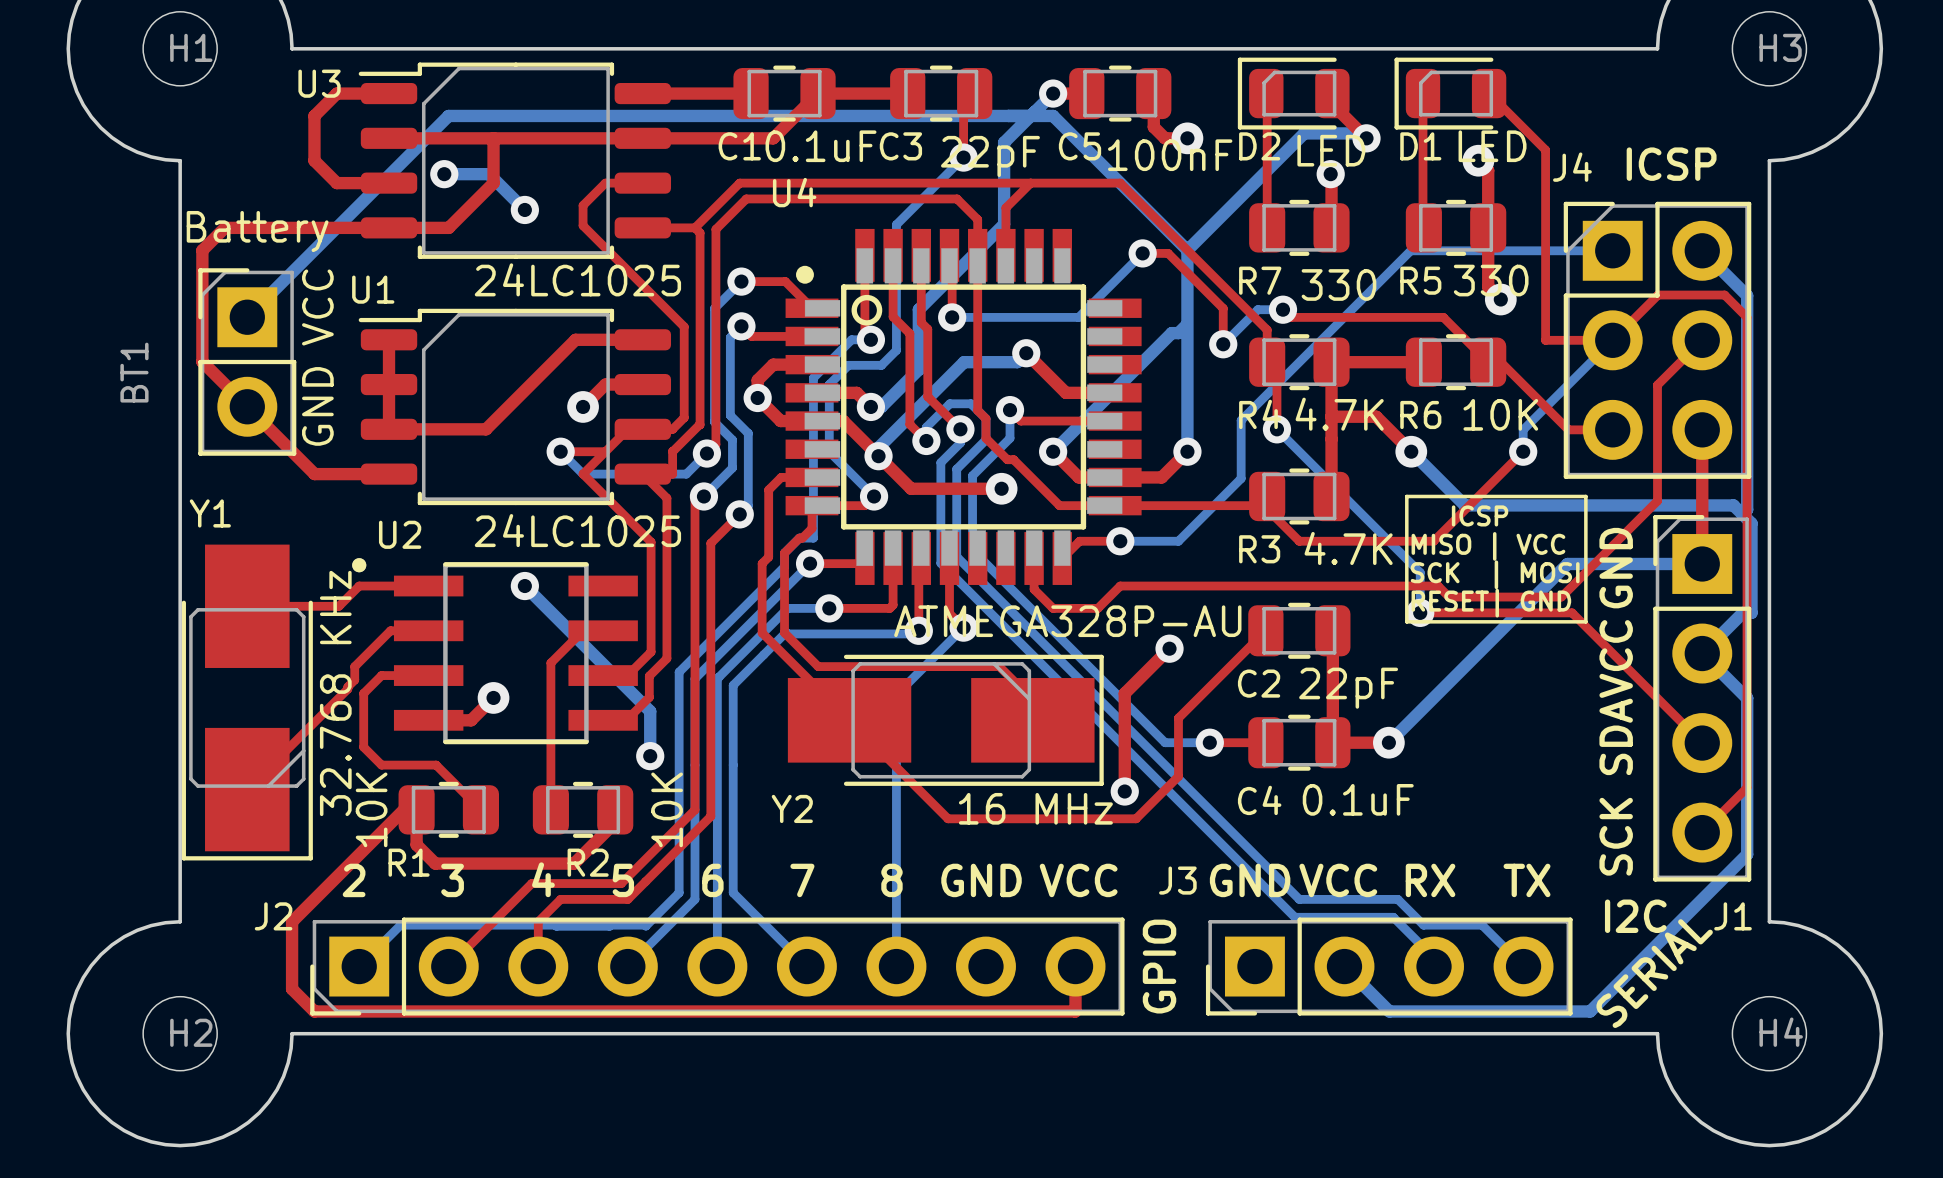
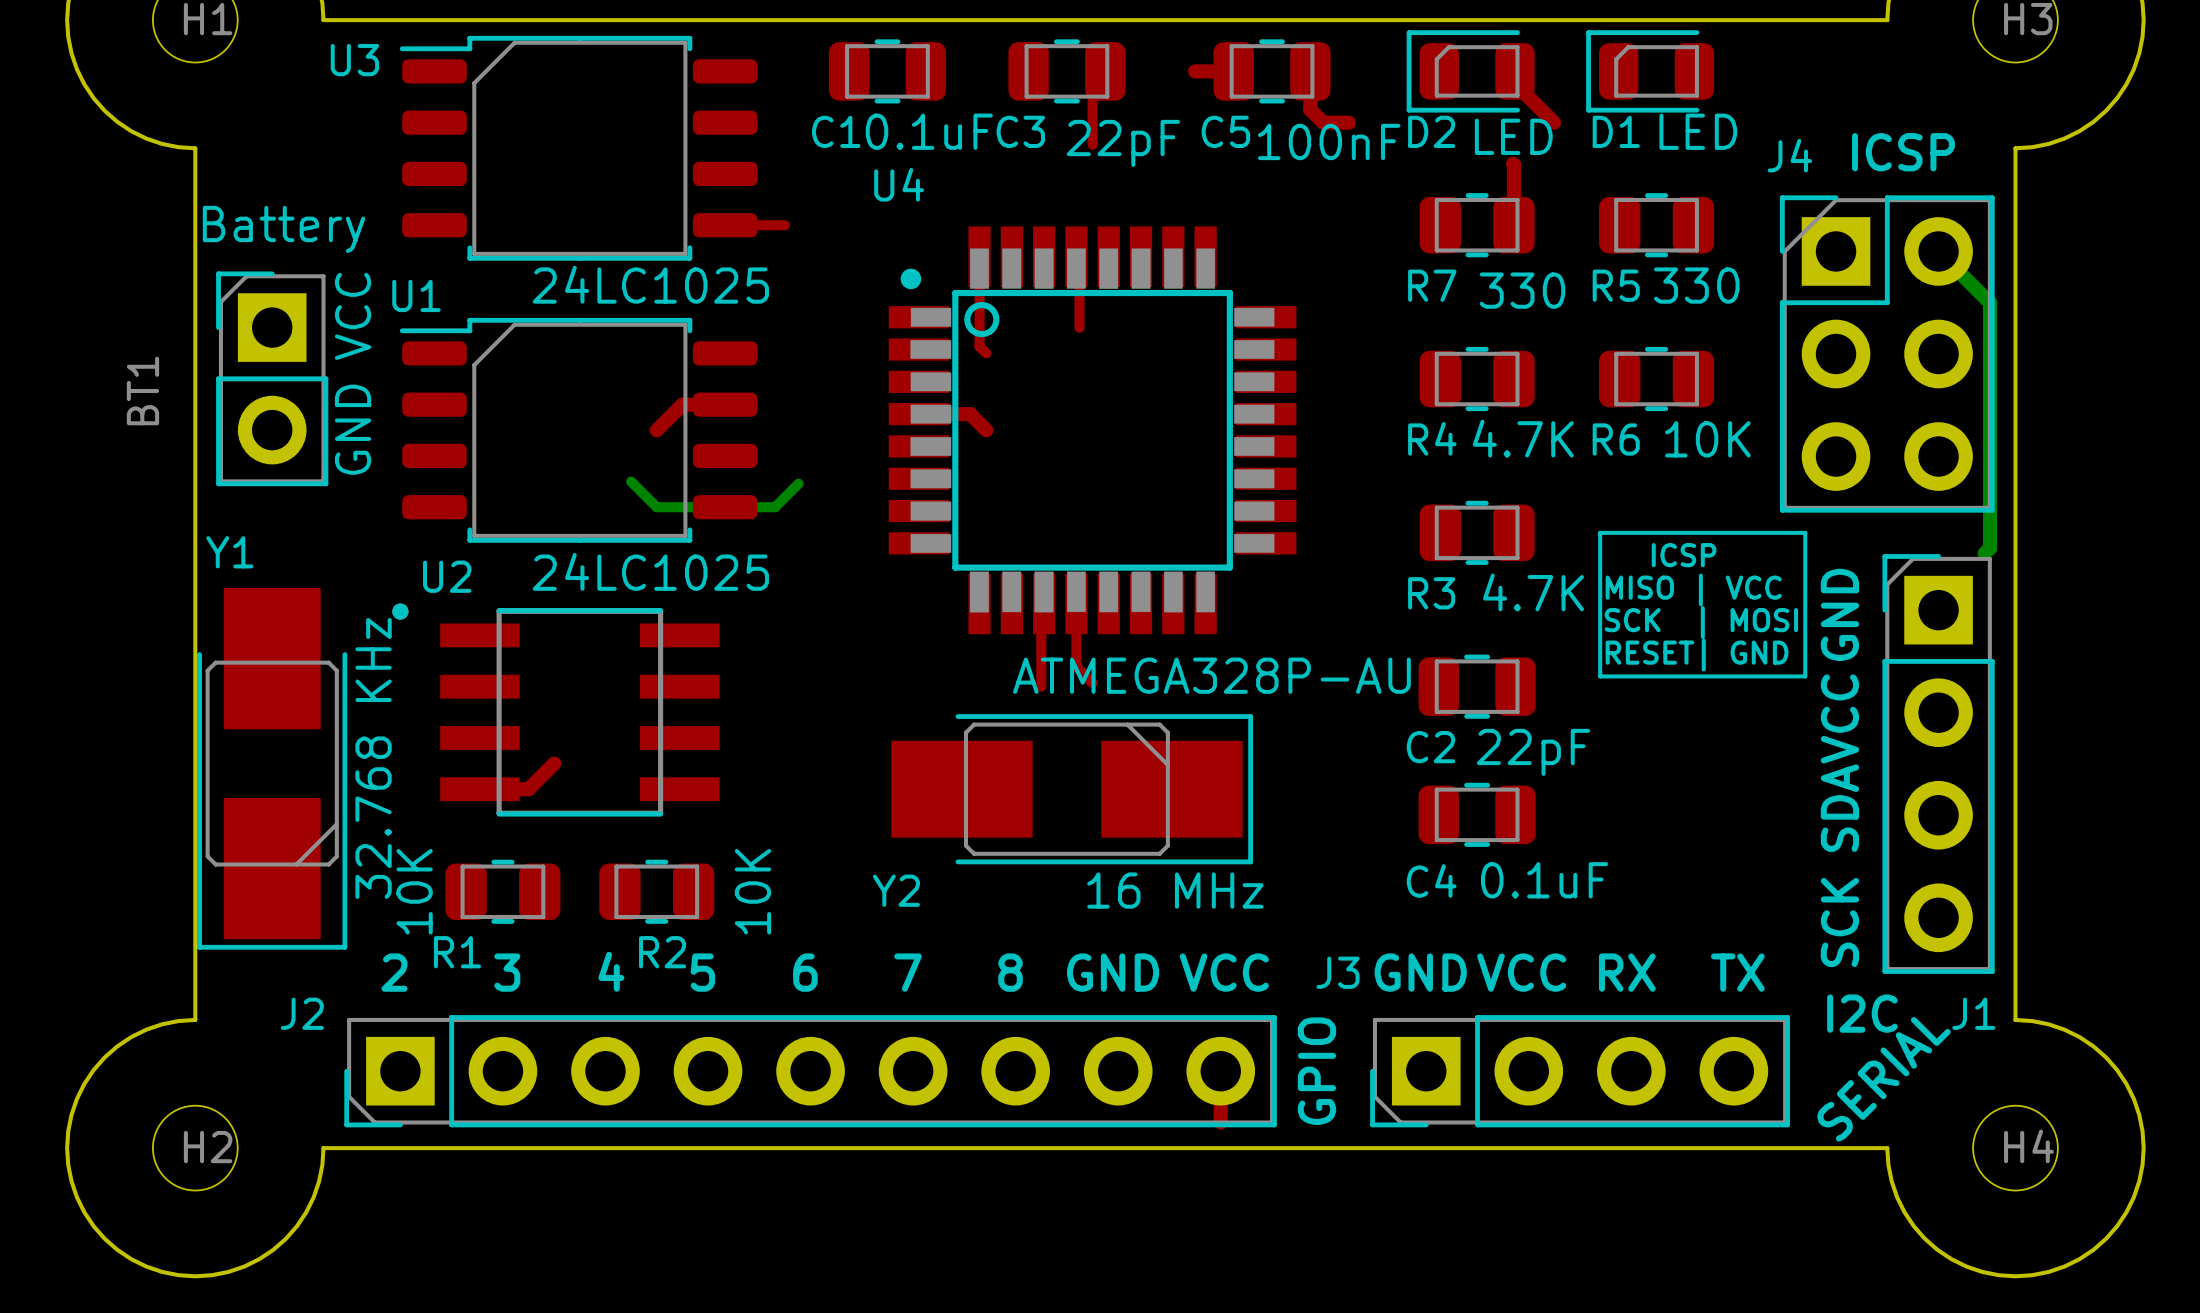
top track: (389, 93) (336, 93) (314, 115) (314, 160) (336, 183) (389, 183) -> none
top track: (642, 93) (751, 93) -> none
top track: (907, 93) (818, 93) (773, 138) (389, 138) -> none
bottom track: (1053, 93) (1004, 142) (1004, 224) (918, 309) (918, 369) (881, 406) (870, 406) -> none
via: (1053, 93) -> none
top track: (1266, 93) (1267, 227) -> none
top track: (1423, 93) (1423, 227) -> none
top track: (1489, 93) (1545, 150) (1545, 340) (1612, 340) (1658, 295) (1724, 295) (1747, 317) (1747, 787) (1702, 832) -> none
top track: (493, 138) (493, 183) (448, 227) (224, 227) (202, 250) (202, 361) (314, 474) (389, 474) -> none
via: (1187, 138) -> none
bottom track: (1366, 138) (1361, 133) (1304, 133) (1187, 250) -> none
via: (1366, 138) -> none
bottom track: (963, 157) (896, 224) (896, 350) (881, 365) (848, 365) (829, 384) (829, 451) (874, 496) -> none
via: (963, 157) -> none
top track: (1478, 160) (1488, 170) (1488, 286) (1500, 299) -> none
via: (1478, 160) -> none
bottom track: (444, 174) (489, 174) (524, 209) -> none
via: (444, 174) -> none
via: (1330, 174) -> none
top track: (642, 183) (605, 183) (583, 205) (583, 225) (684, 326) (684, 417) (672, 429) (627, 429) (583, 474) (651, 542) (651, 651) (627, 675) (603, 675) -> none
top track: (1030, 183) (1005, 207) (1005, 255) -> none
via: (524, 209) -> none
bottom track: (1187, 250) (1053, 115) (448, 115) (247, 317) -> none
bottom track: (1187, 250) (1187, 451) -> none
bottom track: (1612, 250) (1410, 250) (1241, 420) (1241, 478) (1178, 541) (1120, 541) -> none
top track: (1142, 253) (1168, 253) (1223, 308) (1223, 344) -> none
bottom track: (1142, 253) (1078, 317) (952, 317) -> none
via: (1142, 253) -> none
top track: (893, 255) (893, 316) (909, 333) (909, 424) (926, 440) -> none
top track: (921, 255) (921, 322) (927, 329) (927, 396) (960, 429) -> none
top track: (741, 281) (785, 281) (812, 308) -> none
bottom track: (741, 281) (714, 308) (714, 422) (732, 439) (732, 467) (703, 496) -> none
via: (741, 281) -> none
via: (1500, 299) -> none
top track: (1282, 309) (1290, 317) (1443, 317) (1488, 362) (1500, 362) (1568, 429) (1612, 429) -> none
bottom track: (1282, 309) (1257, 309) (1223, 344) -> none
via: (1282, 309) -> none
via: (952, 317) -> none
bottom track: (1186, 325) (1178, 333) (1171, 333) (1053, 451) -> none
top track: (741, 326) (751, 336) (812, 336) -> none
bottom track: (741, 326) (730, 337) (730, 415) (748, 433) (748, 505) (739, 514) -> none
via: (741, 326) -> none
top track: (389, 339) (389, 429) (486, 429) (575, 339) (642, 339) -> none
bottom track: (870, 339) (851, 339) (813, 378) (813, 538) (799, 538) (784, 553) (784, 566) (679, 672) (679, 892) (645, 926) (400, 925) (359, 966) -> none
via: (870, 339) -> none
bottom track: (1612, 340) (1523, 429) (1523, 451) -> none
top track: (1702, 340) (1657, 385) (1657, 500) (1561, 597) (1449, 597) (1438, 586) (1120, 586) (1097, 608) (1053, 608) (1034, 589) (1034, 558) -> none
via: (1223, 344) -> none
top track: (1026, 353) (1065, 392) (1115, 392) -> none
bottom track: (1026, 353) (1017, 362) (964, 362) (878, 447) (878, 456) -> none
via: (1026, 353) -> none
top track: (1423, 362) (1331, 362) (1331, 496) -> none
top track: (812, 364) (773, 364) (757, 380) (757, 397) (780, 421) (843, 421) (911, 488) (1001, 488) -> none
via: (757, 397) -> none
via: (583, 406) -> none
via: (870, 406) -> none
top track: (1010, 410) (1020, 421) (1115, 421) -> none
bottom track: (1010, 410) (1010, 438) (972, 475) (972, 550) (1165, 742) (1209, 742) -> none
via: (1010, 410) -> none
top track: (1331, 416) (1376, 416) (1411, 451) -> none
top track: (699, 424) (673, 451) -> none
top track: (700, 424) (700, 232) (694, 227) (739, 183) (1120, 183) (1267, 330) (1267, 362) (1276, 371) (1276, 429) -> none
bottom track: (960, 429) (960, 443) (940, 462) (940, 563) (1294, 917) (1393, 917) (1434, 957) (1434, 966) -> none
via: (960, 429) -> none
bottom track: (1276, 429) (1420, 572) (1420, 612) -> none
via: (1276, 429) -> none
top track: (1702, 429) (1702, 563) -> none
bottom track: (926, 440) (926, 427) (949, 403) (971, 403) (985, 418) (985, 439) (956, 469) (956, 556) (1299, 899) (1397, 899) (1423, 925) (1482, 925) (1523, 966) -> none
via: (926, 440) -> none
top track: (560, 451) (605, 451) -> none
via: (560, 451) -> none
top track: (672, 451) (672, 474) (642, 474) (666, 498) (666, 658) (649, 676) (649, 697) (626, 720) (603, 720) -> none
top track: (1053, 451) (1078, 477) (1161, 477) (1187, 451) -> none
via: (1053, 451) -> none
via: (1187, 451) -> none
bottom track: (1411, 451) (1465, 505) (1733, 505) (1751, 523) (1751, 612) (1742, 612) (1702, 653) (1747, 698) (1747, 854) (1590, 1011) (1389, 1011) (1344, 966) -> none
via: (1411, 451) -> none
top track: (1523, 451) (1433, 541) (1299, 541) (1267, 509) (1267, 496) -> none
via: (1523, 451) -> none
top track: (706, 453) (715, 444) (715, 229) (746, 198) (957, 198) (977, 219) (977, 410) (985, 418) (985, 438) (1007, 459) (1013, 459) (1059, 505) (1258, 505) -> none
via: (706, 453) -> none
via: (878, 456) -> none
top track: (812, 477) (781, 477) (768, 489) (768, 557) (762, 563) (762, 632) (948, 818) (1136, 818) (1178, 776) (1178, 718) (1265, 630) -> none
via: (1001, 488) -> none
top track: (703, 496) (694, 496) (694, 809) (621, 883) (531, 883) (448, 966) -> none
via: (703, 496) -> none
top track: (874, 496) (864, 505) (812, 505) (812, 528) (784, 553) (784, 632) (818, 666) (999, 666) (1032, 700) (1032, 720) -> none
via: (874, 496) -> none
top track: (739, 514) (710, 543) (710, 816) (627, 899) (560, 899) (538, 921) (538, 966) -> none
via: (739, 514) -> none
top track: (1120, 541) (1079, 541) (1062, 558) -> none
via: (1120, 541) -> none
top track: (864, 558) (859, 563) (810, 563) -> none
top track: (893, 558) (893, 605) (889, 608) (829, 608) -> none
bottom track: (810, 563) (694, 678) (694, 899) (627, 966) -> none
via: (810, 563) -> none
bottom track: (1702, 563) (1567, 563) (1388, 742) -> none
top track: (428, 586) (359, 586) (338, 606) (247, 606) -> none
bottom track: (524, 586) (650, 711) (650, 756) -> none
via: (524, 586) -> none
bottom track: (829, 608) (787, 608) (717, 678) (717, 966) -> none
via: (829, 608) -> none
top track: (1420, 612) (1572, 612) (1702, 743) -> none
via: (1420, 612) -> none
bottom track: (963, 627) (896, 694) (896, 966) -> none
via: (963, 627) -> none
top track: (428, 630) (390, 630) (354, 666) (354, 680) (347, 689) (247, 789) -> none
top track: (603, 630) (583, 630) (550, 662) (550, 809) -> none
bottom track: (918, 630) (915, 633) (787, 633) (786, 632) (733, 685) (733, 892) (806, 966) -> none
via: (918, 630) -> none
top track: (1332, 630) (1332, 742) (1388, 742) -> none
top track: (1169, 648) (1124, 693) (1124, 791) -> none
via: (1169, 648) -> none
top track: (428, 675) (381, 675) (363, 693) (363, 747) (381, 765) (436, 765) (480, 809) -> none
via: (493, 697) -> none
top track: (1209, 742) (1265, 742) -> none
via: (1209, 742) -> none
via: (1388, 742) -> none
via: (650, 756) -> none
via: (1124, 791) -> none
top track: (416, 809) (416, 844) (435, 863) (574, 863) (615, 822) (615, 809) -> none
top track: (422, 809) (404, 809) (292, 921) (292, 989) (314, 1011) (1075, 1011) -> none

